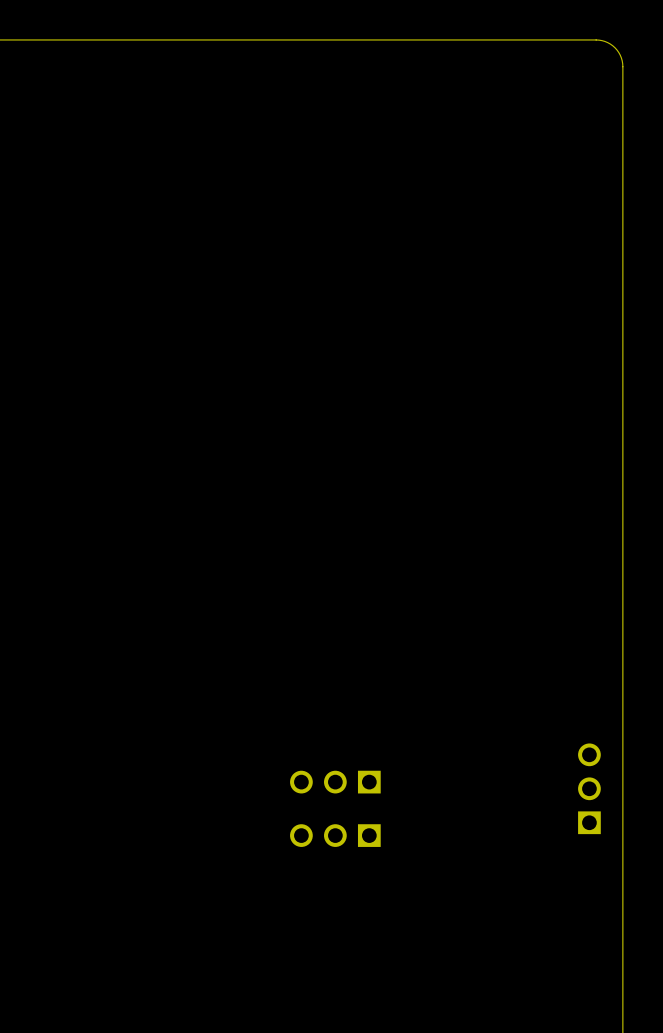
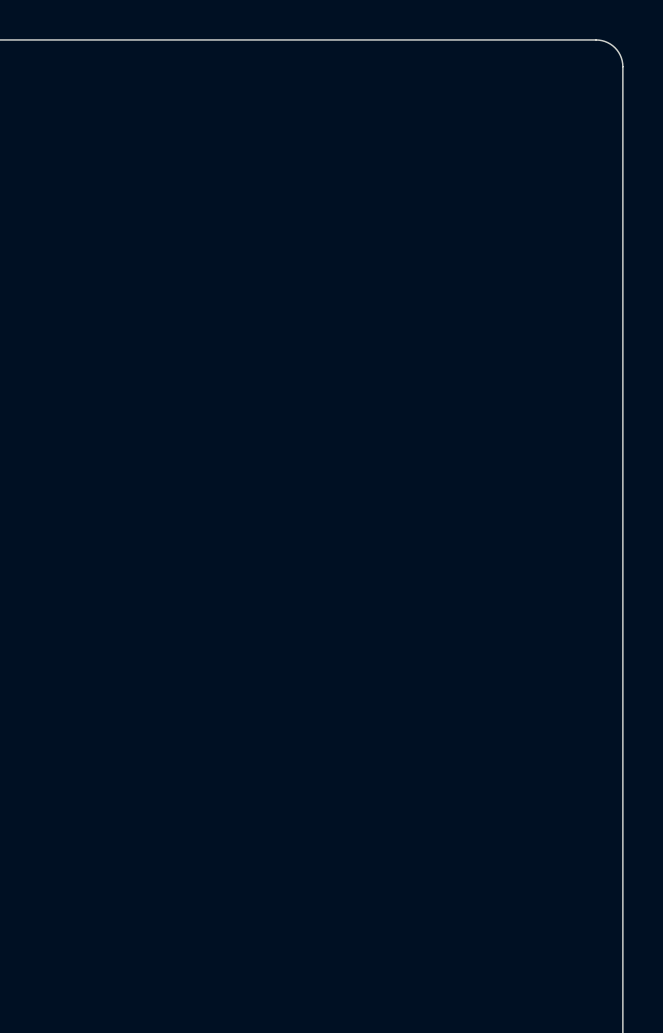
part: (335, 782) -> none
part: (589, 788) -> none
part: (335, 835) -> none

